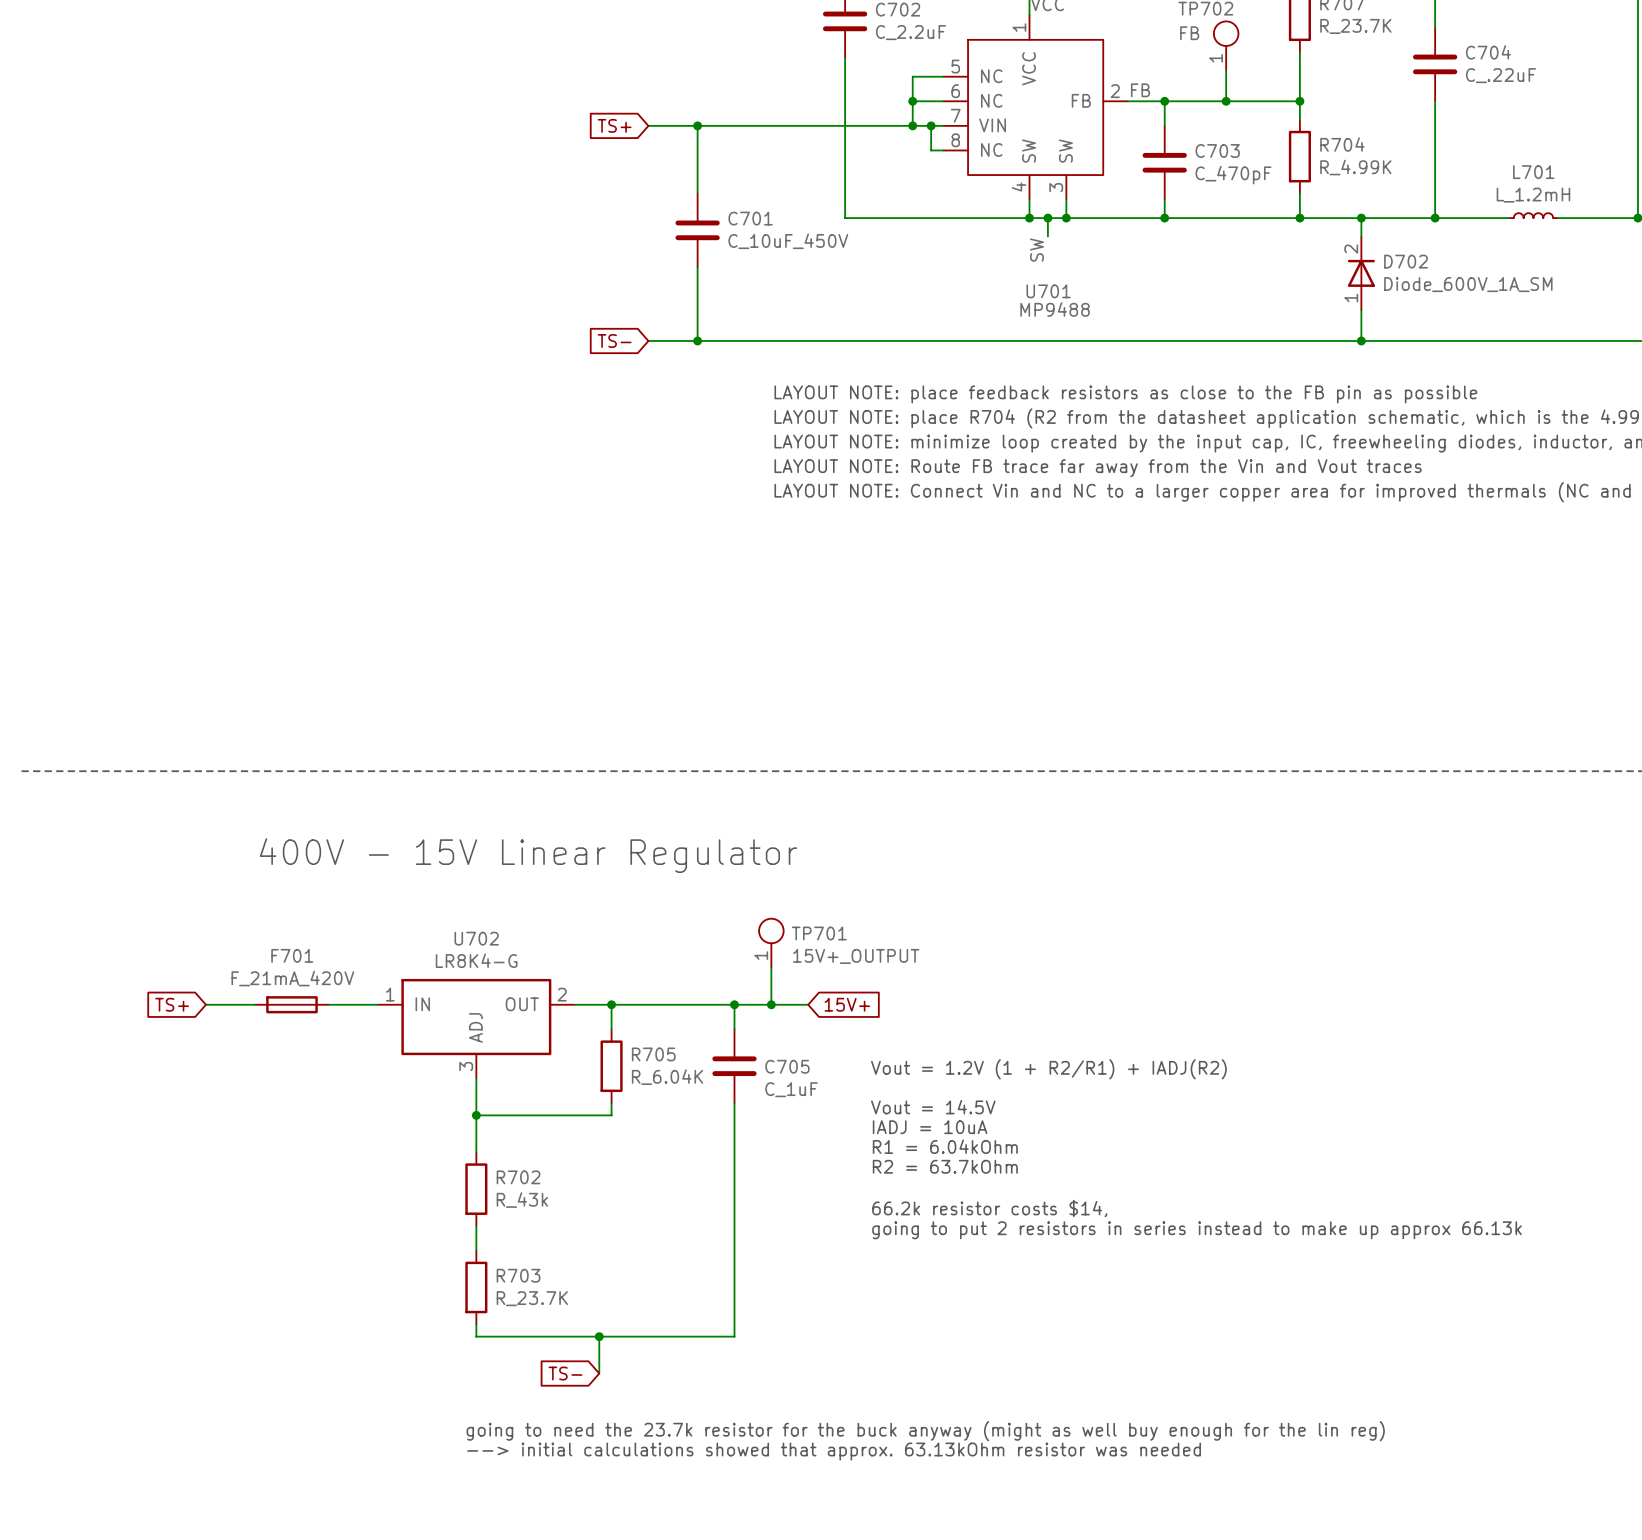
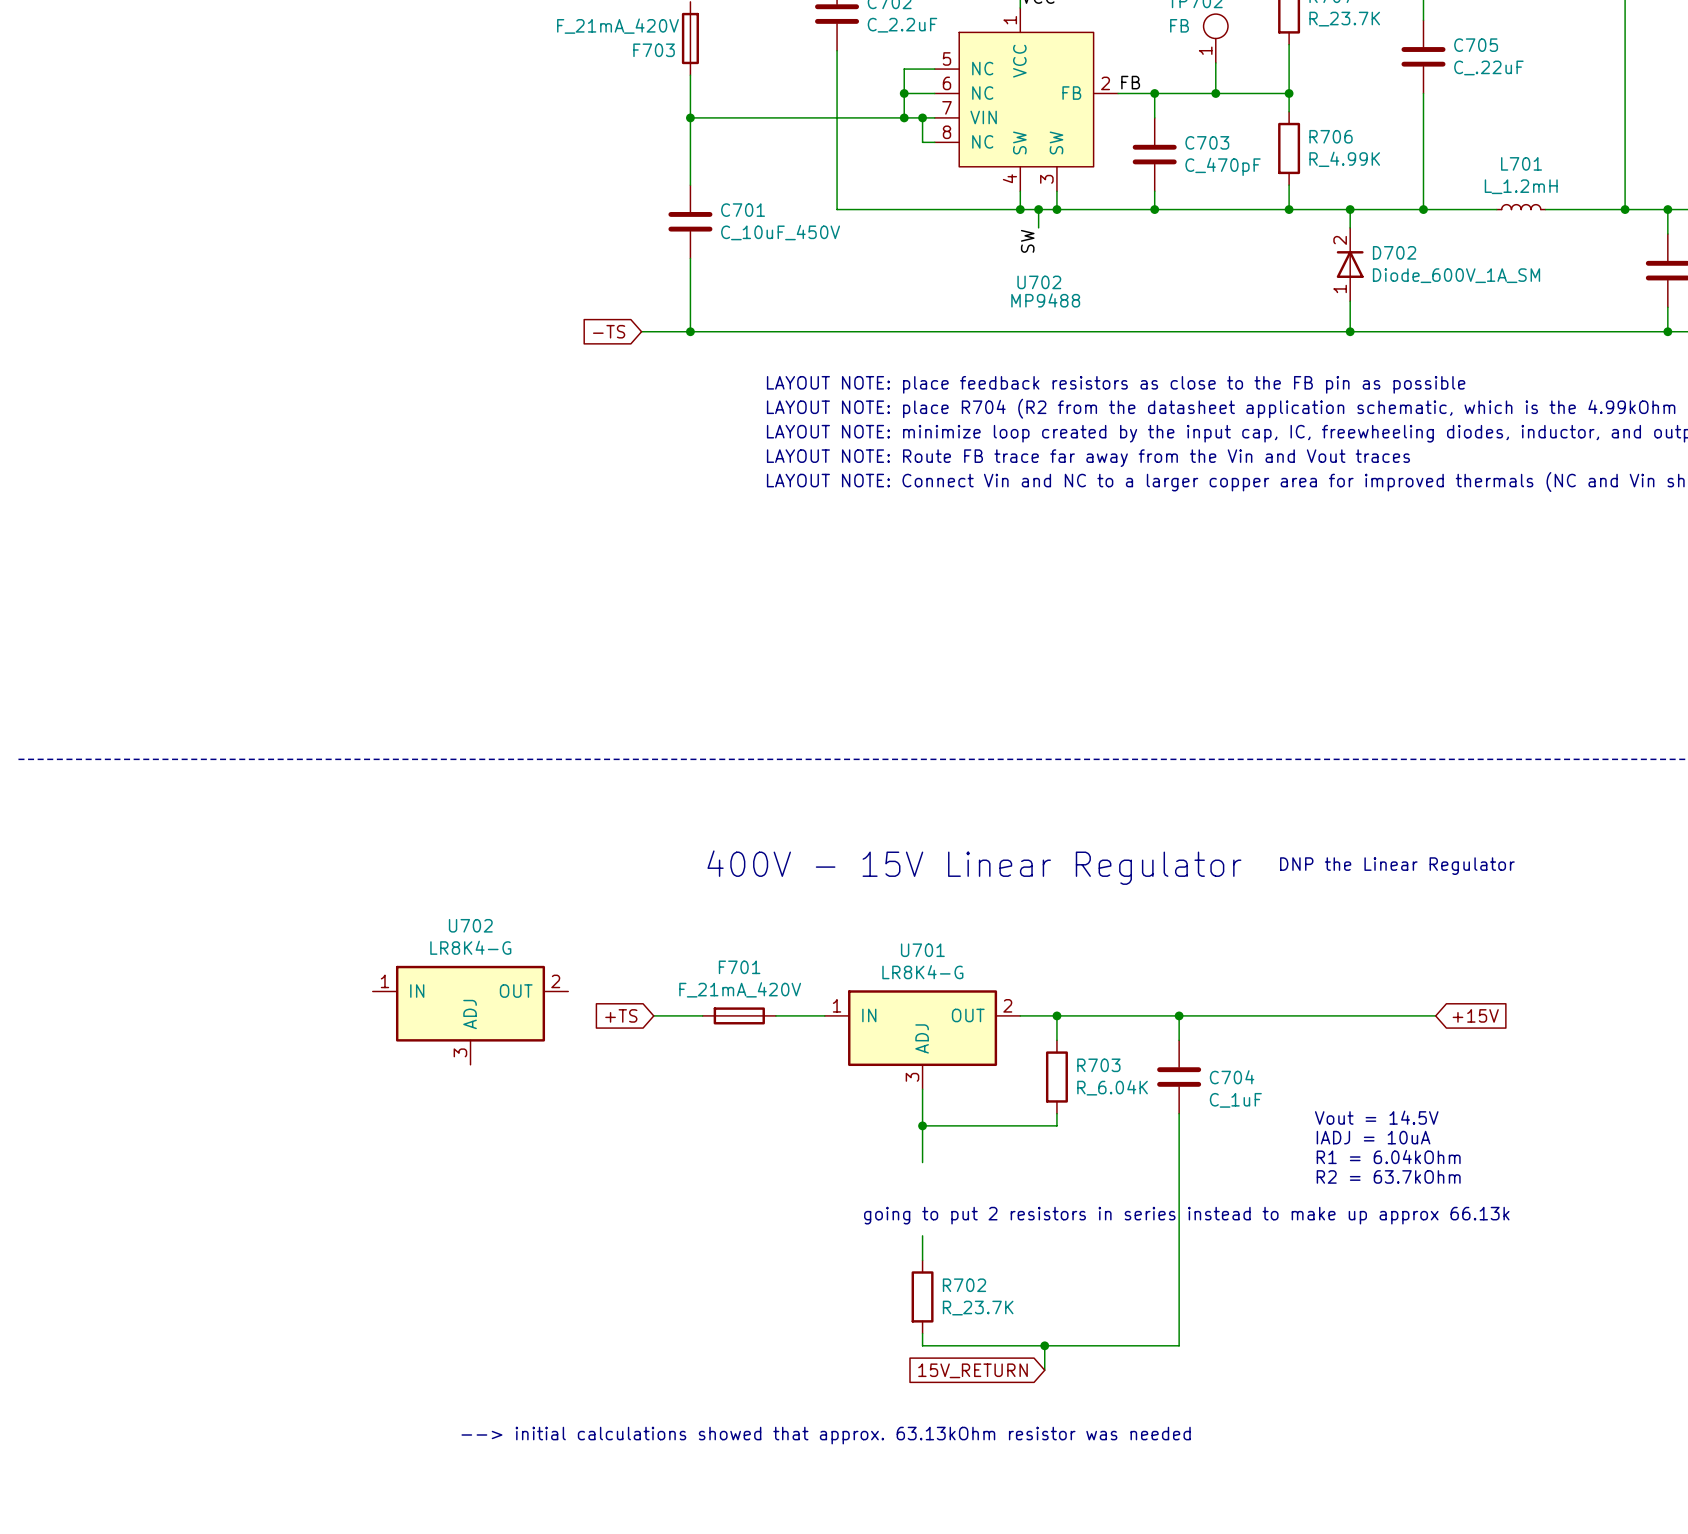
F703: none -> F_21mA_420V (690, 38)
C704 name: C704 (1488, 52) -> C705 (1476, 45)
global label: TS+ (614, 125) -> none
wire: (648, 125) (697, 125) -> (690, 75) (690, 117)
R704 name: R704 (1342, 144) -> R706 (1331, 136)
U701 name: U701 (1048, 291) -> U702 (1039, 282)
global label: TS- (614, 340) -> -TS (609, 331)
text: 400V - 15V Linear Regulator (528, 855) -> none
text: none -> DNP the Linear Regulator (1397, 866)
text: none -> 400V - 15V Linear Regulator (974, 867)
TP701: 15V+_OUTPUT (771, 943) -> none
wire: (771, 967) (771, 1004) -> none
global label: TS+ (172, 1004) -> none
wire: (205, 1004) (255, 1004) -> none
F701 position: (291, 1004) -> (739, 1015)
wire: (328, 1004) (378, 1004) -> none
wire: (574, 1004) (808, 1004) -> none
wire: (611, 1004) (611, 1029) -> none
junction: (611, 1004) -> none
wire: (734, 1004) (734, 1029) -> none
junction: (734, 1004) -> none
junction: (771, 1004) -> none
global label: 15V+ (847, 1004) -> none
global label: none -> +TS (621, 1015)
wire: none -> (653, 1015) (702, 1015)
wire: none -> (775, 1015) (824, 1015)
wire: none -> (1020, 1015) (1435, 1015)
wire: none -> (1056, 1015) (1056, 1040)
junction: none -> (1056, 1015)
wire: none -> (1179, 1015) (1179, 1040)
junction: none -> (1179, 1015)
global label: none -> +15V (1475, 1015)
U701: none -> LR8K4-G (922, 1039)
R705: R_6.04K (611, 1066) -> none
C705: C_1uF (734, 1066) -> none
text: Vout = 1.2V (1 + R2/R1) + IADJ(R2) (1048, 1069) -> none
wire: (476, 1078) (476, 1152) -> none
C704: none -> C_1uF (1179, 1077)
wire: (611, 1103) (611, 1115) (476, 1115) -> none
wire: (734, 1103) (734, 1336) (476, 1336) (476, 1324) -> none
wire: none -> (922, 1089) (922, 1162)
text: Vout = 14.5V (933, 1107) -> none
junction: (476, 1115) -> none
text: IADJ = 10uA (930, 1127) -> none
wire: none -> (1056, 1113) (1056, 1125) (922, 1125)
wire: none -> (1179, 1113) (1179, 1345) (922, 1345) (922, 1333)
text: none -> Vout = 14.5V (1376, 1117)
junction: none -> (922, 1125)
text: R1 = 6.04kOhm (945, 1146) -> none
text: none -> IADJ = 10uA (1373, 1137)
text: R2 = 63.7kOhm (945, 1166) -> none
text: none -> R1 = 6.04kOhm (1388, 1157)
R702 position: (476, 1189) -> (922, 1296)
text: none -> R2 = 63.7kOhm (1388, 1176)
R702 value: R_43k (522, 1200) -> R_23.7K (978, 1308)
text: 66.2k resistor costs $14, (989, 1208) -> none
wire: (476, 1226) (476, 1250) -> none
wire: none -> (922, 1235) (922, 1260)
R703 position: (476, 1287) -> (1056, 1077)
R703 value: R_23.7K (532, 1298) -> R_6.04K (1112, 1087)
wire: (599, 1336) (599, 1373) -> none
junction: (599, 1336) -> none
wire: none -> (1044, 1345) (1044, 1370)
junction: none -> (1044, 1345)
global label: TS- (565, 1373) -> none
global label: none -> 15V_RETURN (973, 1370)
text: going to need the 23.7k resistor for the buck anyway (might as well buy enough for the lin reg) (925, 1431) -> none

